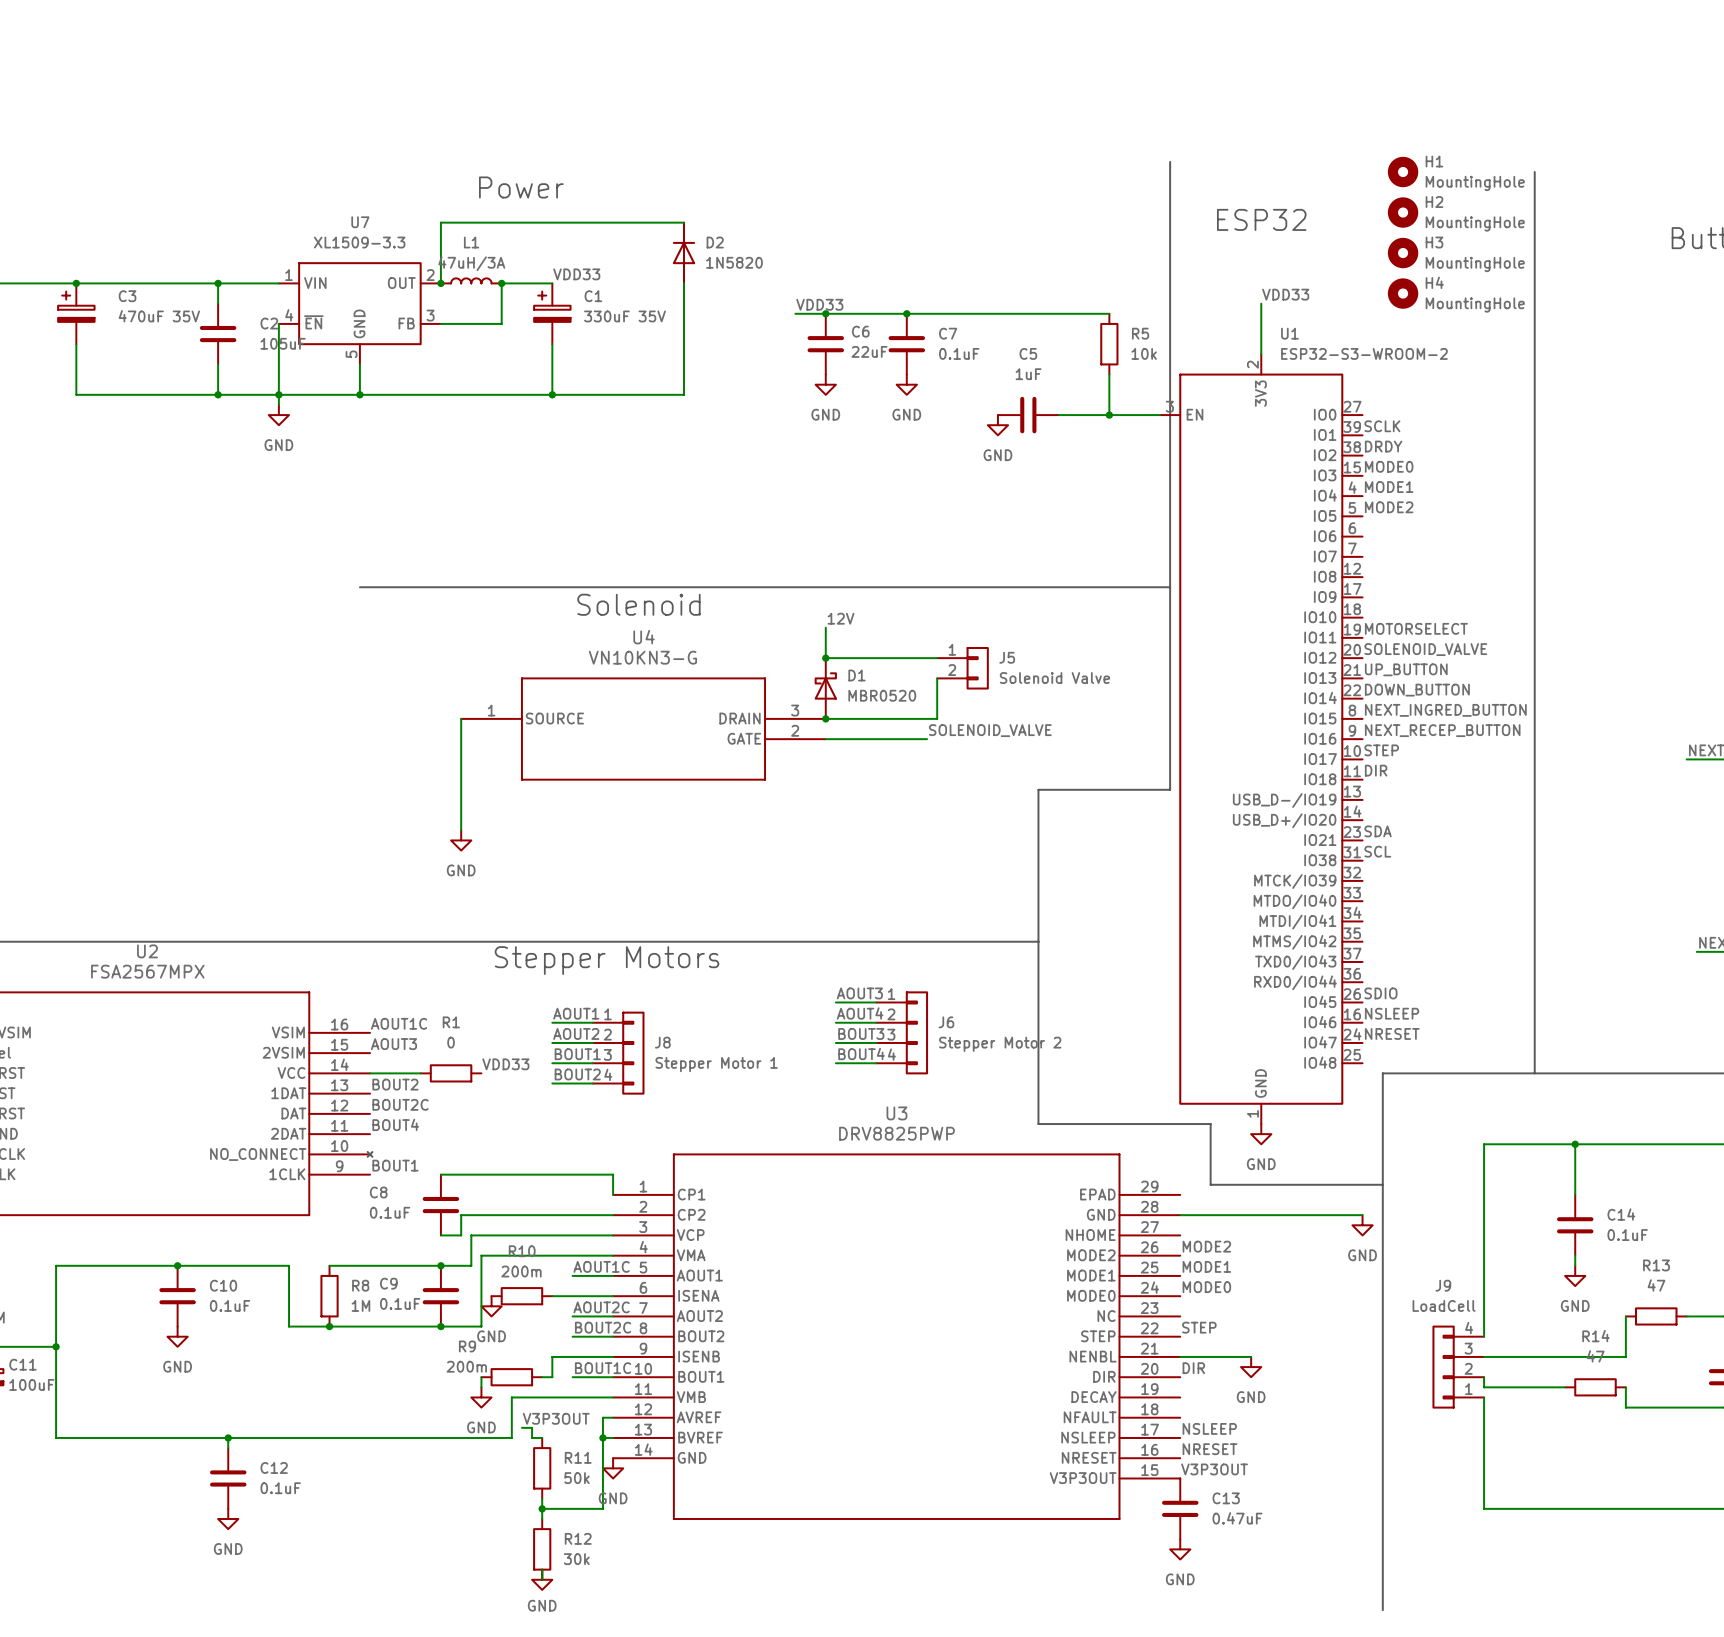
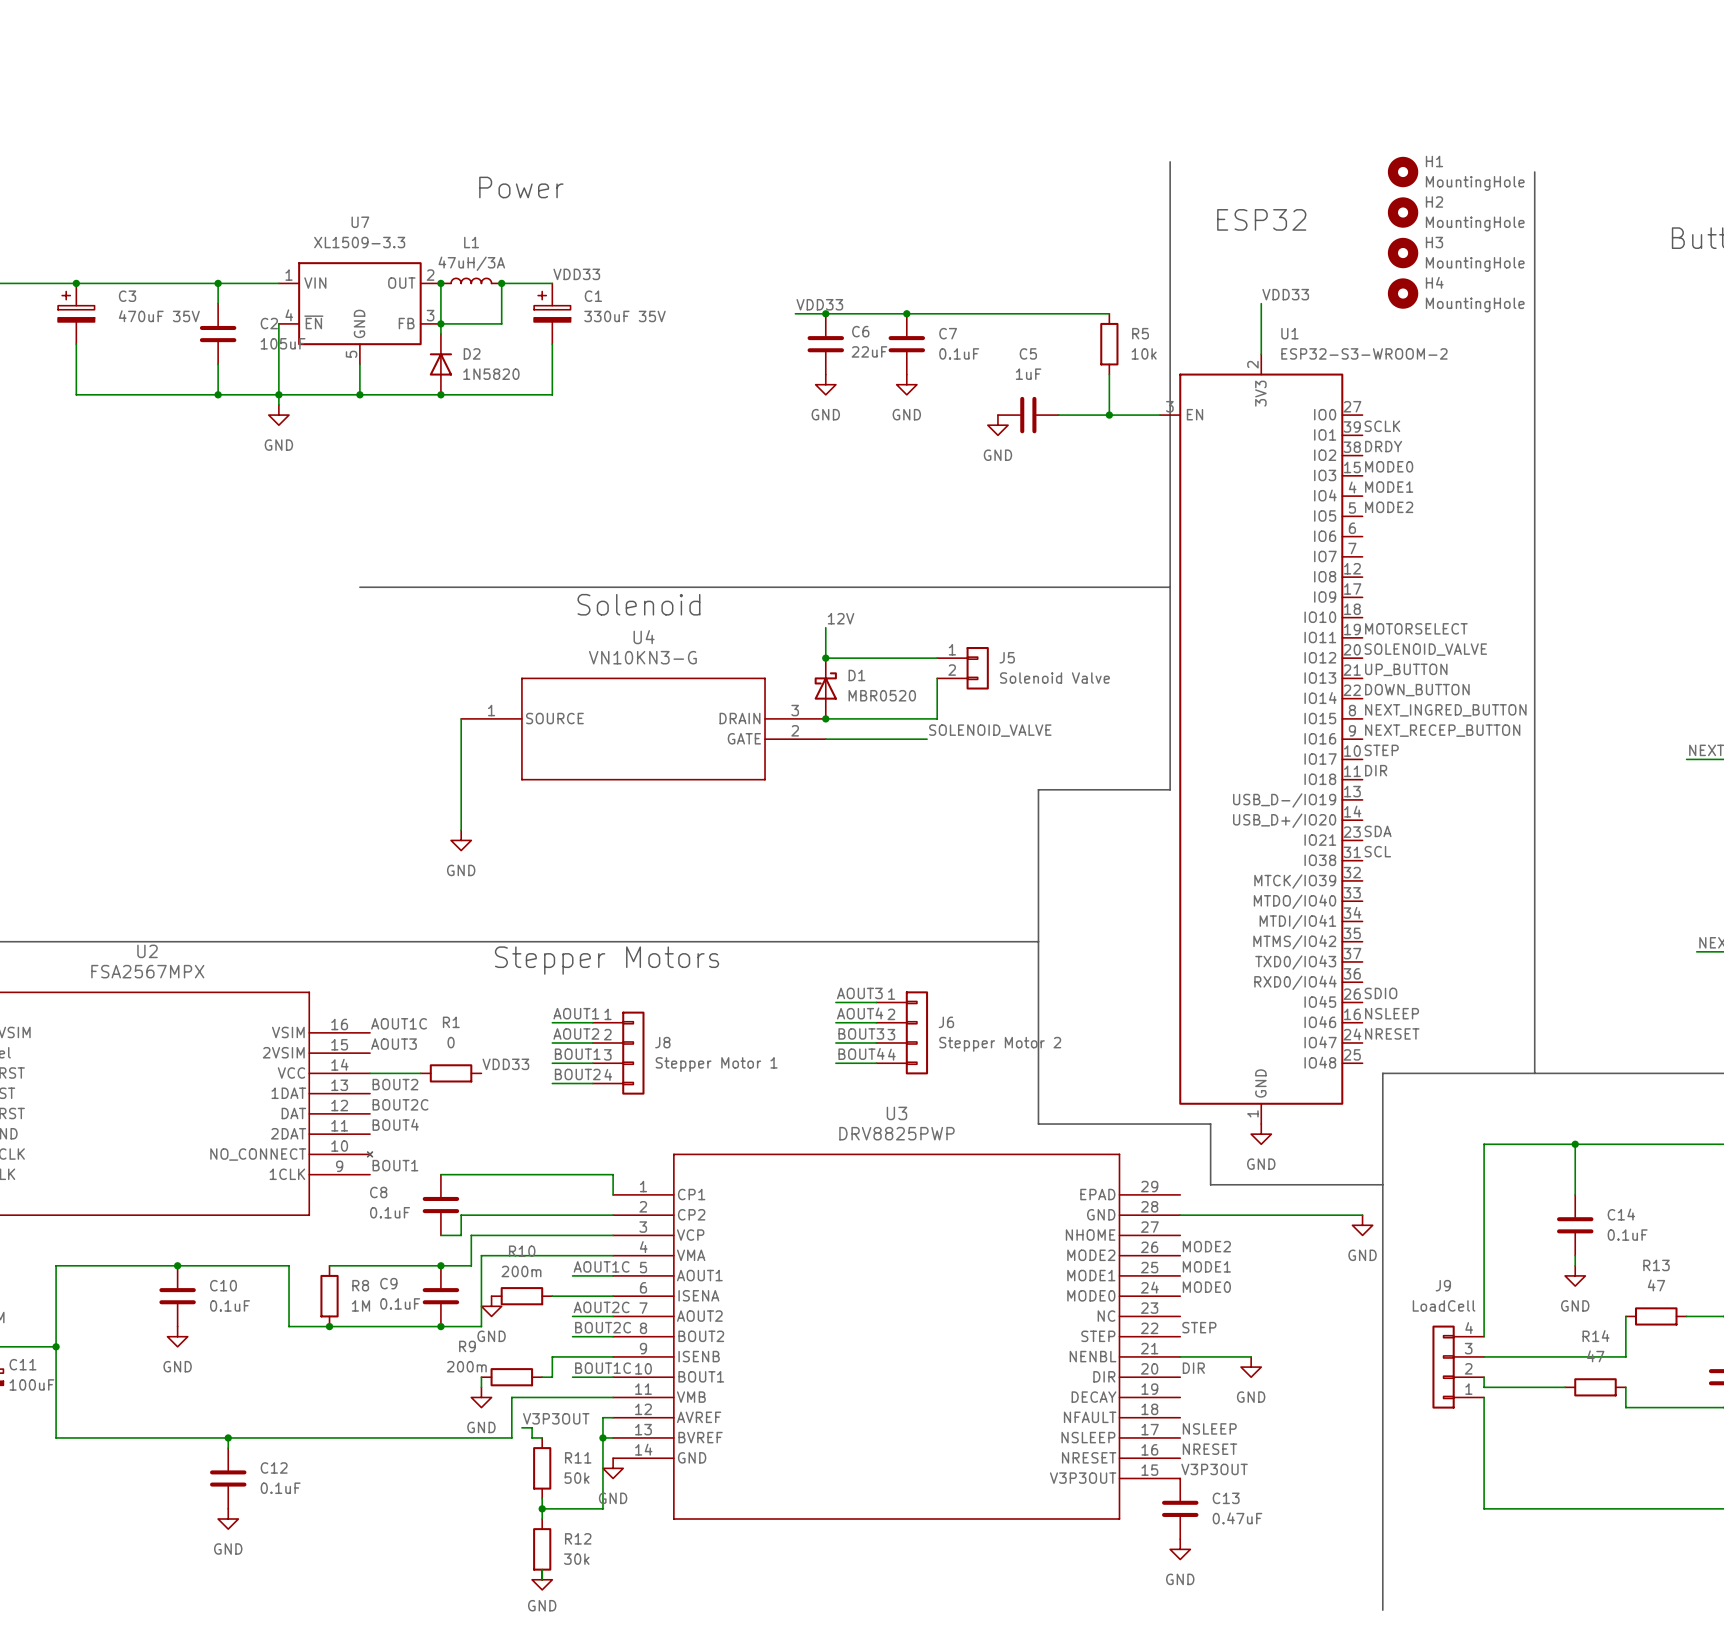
wire: (683, 222) (440, 222) (440, 283) -> (440, 334) (440, 283)
D2 position: (683, 253) -> (440, 364)
wire: (683, 283) (683, 394) (552, 394) -> none
junction: none -> (440, 323)
junction: none -> (440, 394)
junction: (552, 394) -> none

